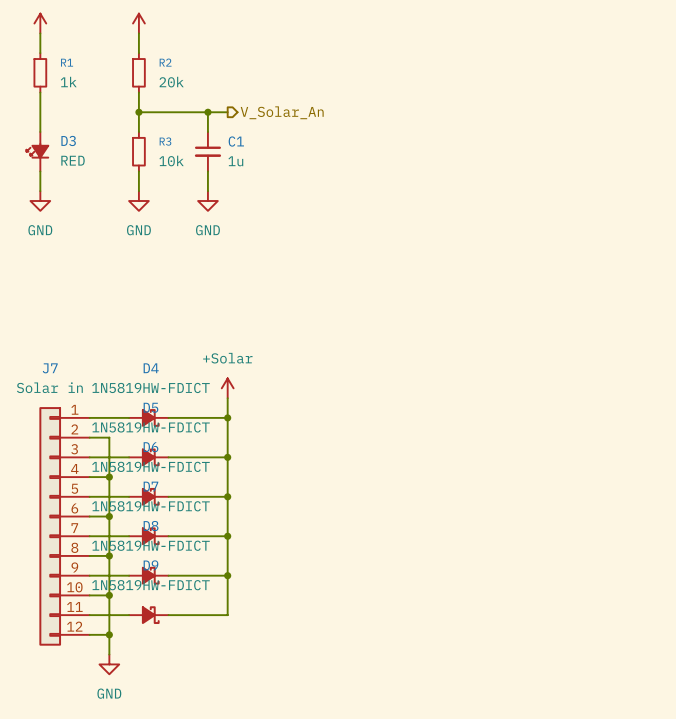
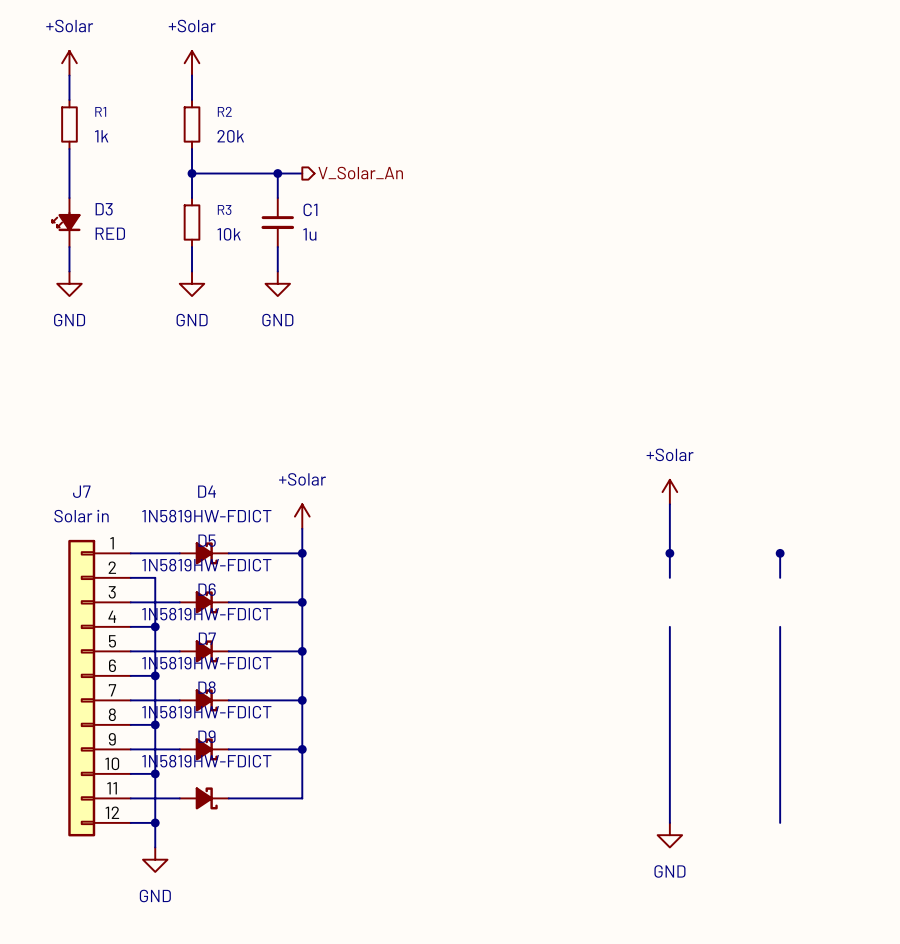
power symbol: none -> +Solar (669, 492)
wire: none -> (669, 504) (669, 577)
junction: none -> (669, 553)
wire: none -> (780, 553) (780, 577)
junction: none -> (780, 553)
wire: none -> (669, 626) (669, 822)
wire: none -> (780, 626) (780, 822)
power symbol: none -> GND (669, 835)

